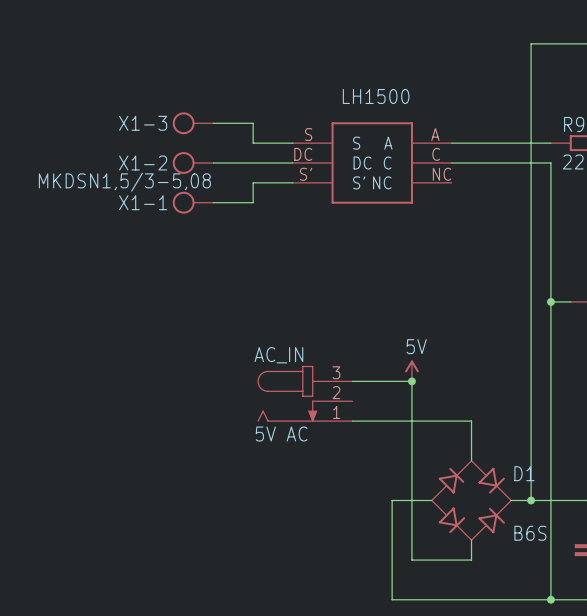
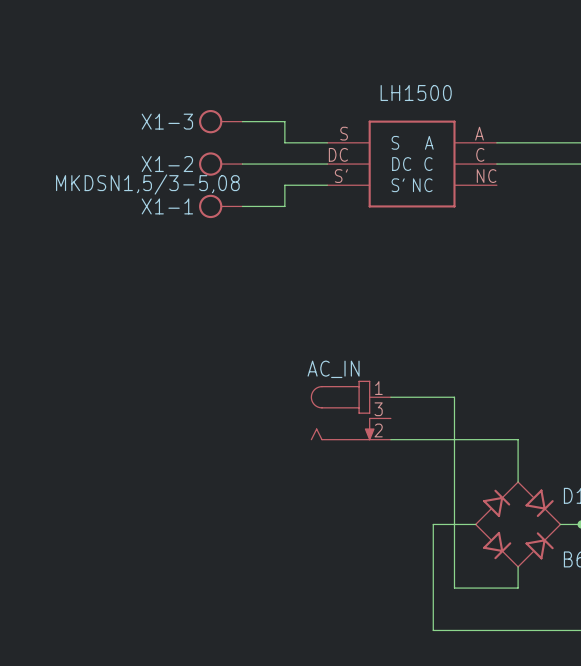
power symbol: 5V (411, 370) -> none
junction: (411, 381) -> none
AC_IN: 5V AC (304, 393) -> none
AC_IN: none -> (350, 410)

